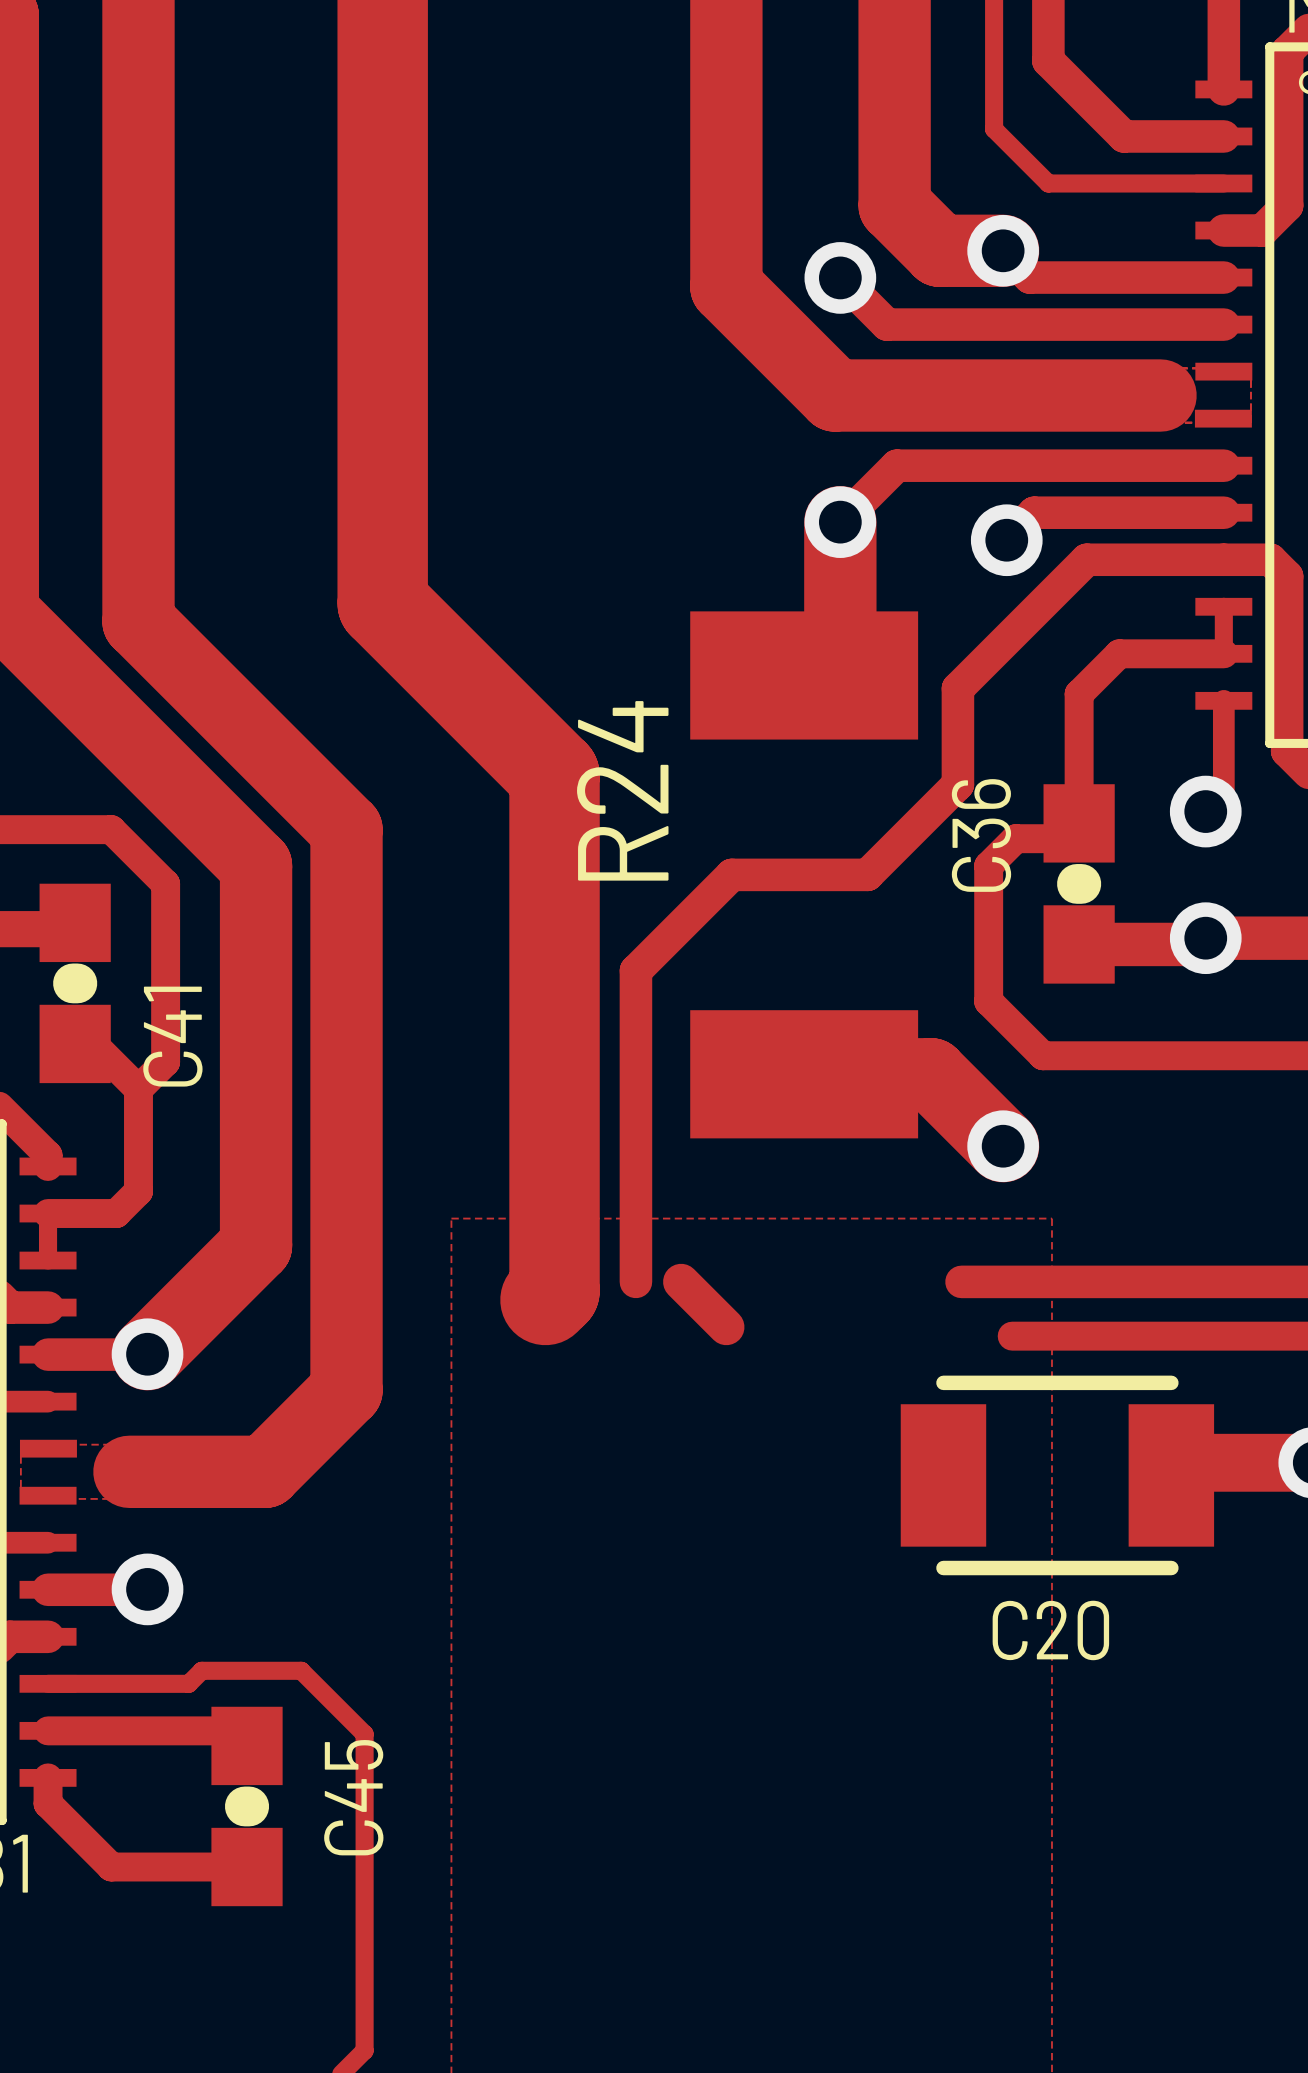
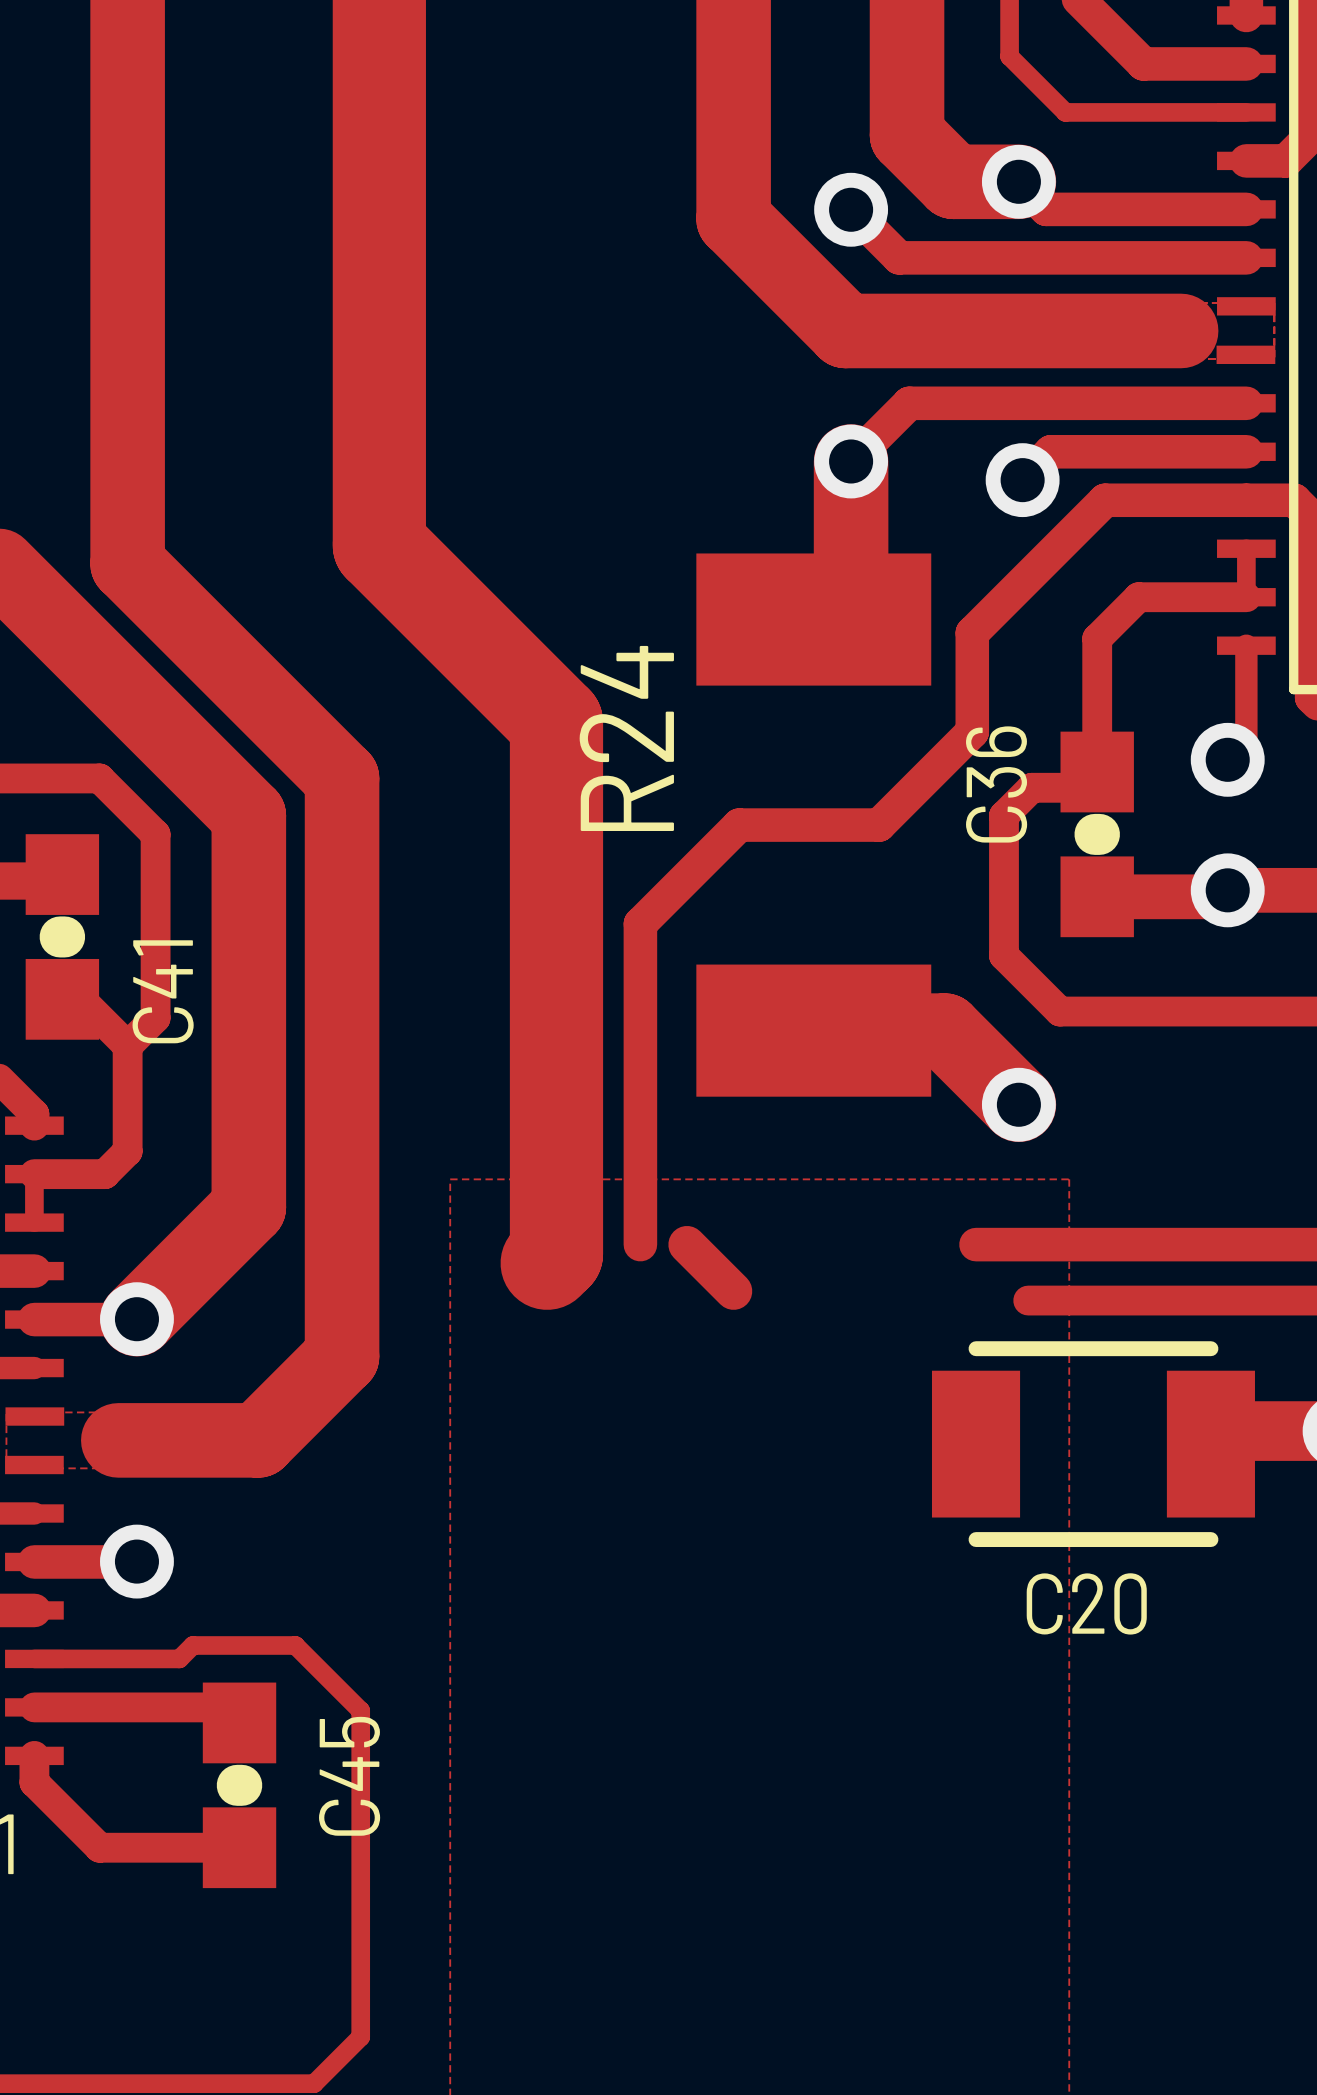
C20 position: (1057, 1475) -> (1093, 1444)

